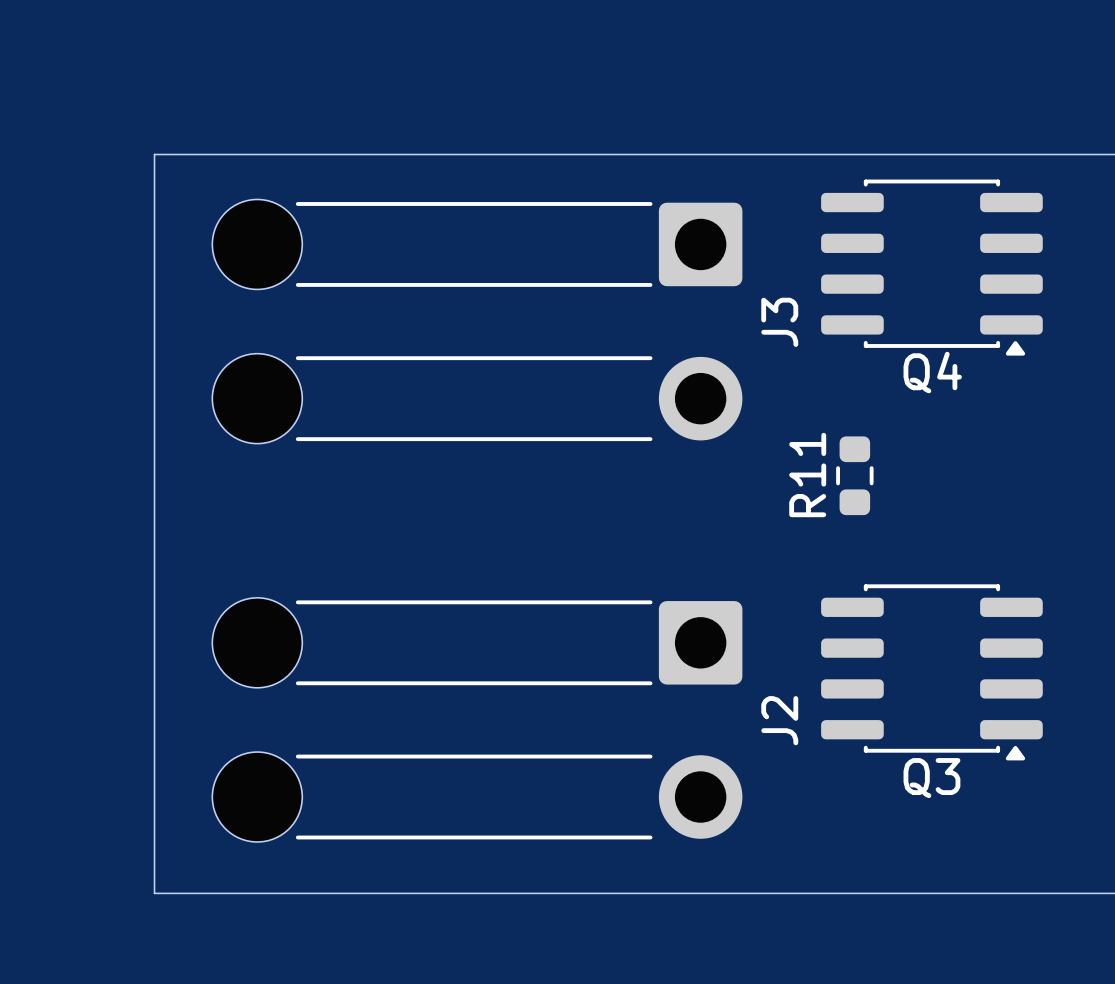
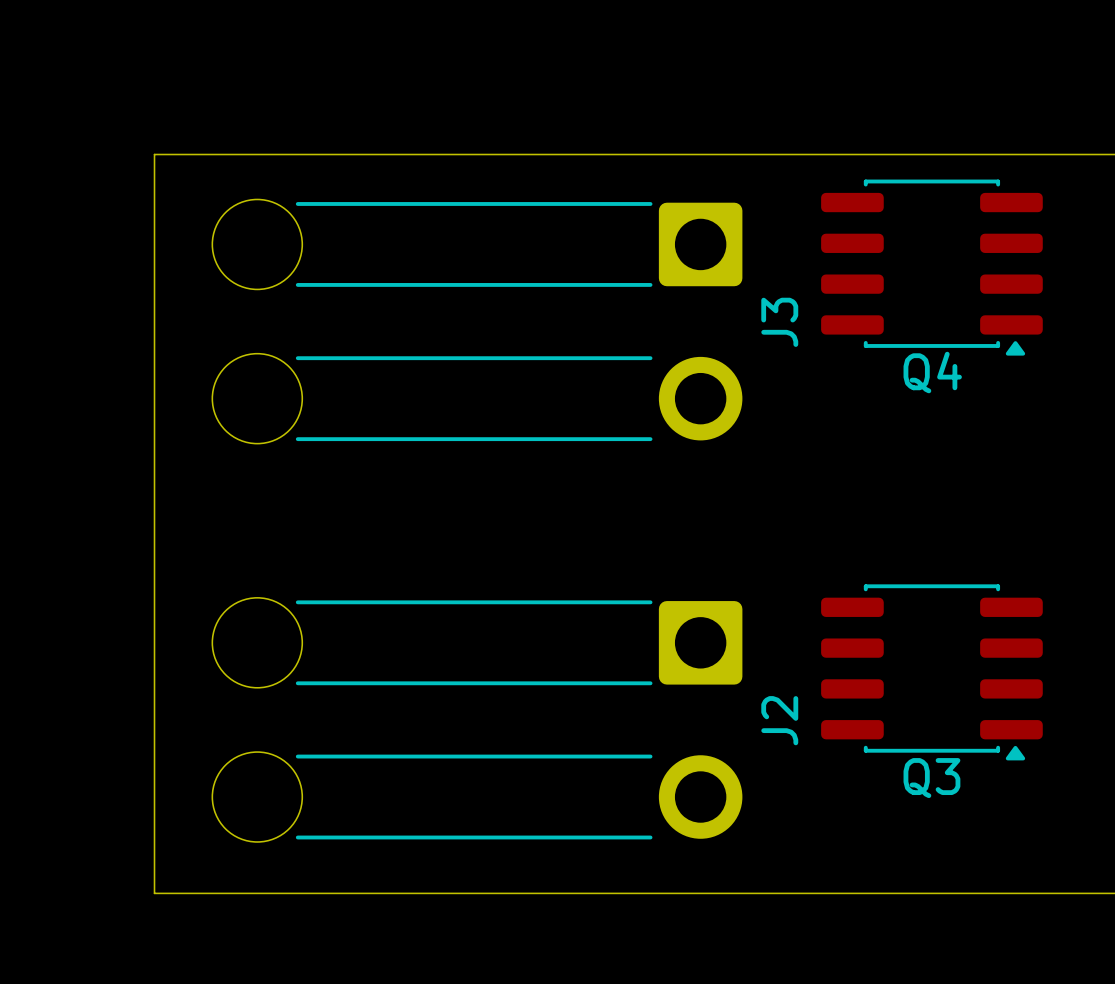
R11: (854, 475) -> none

